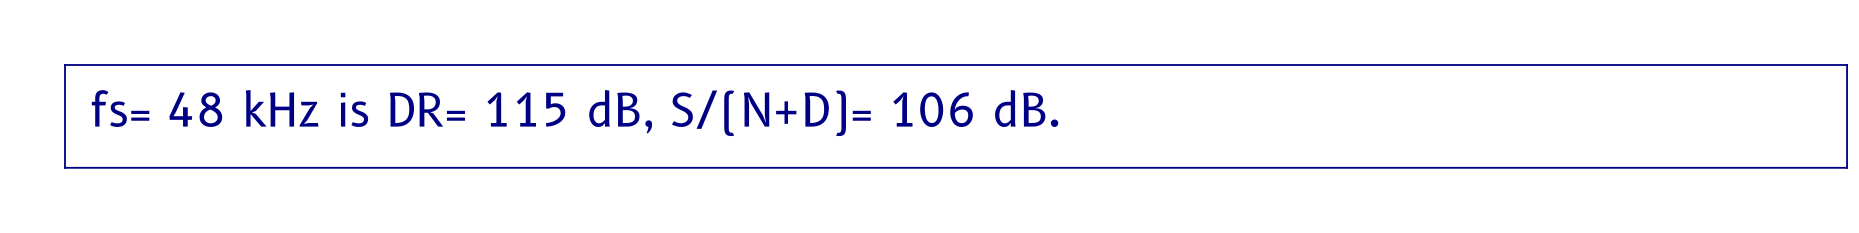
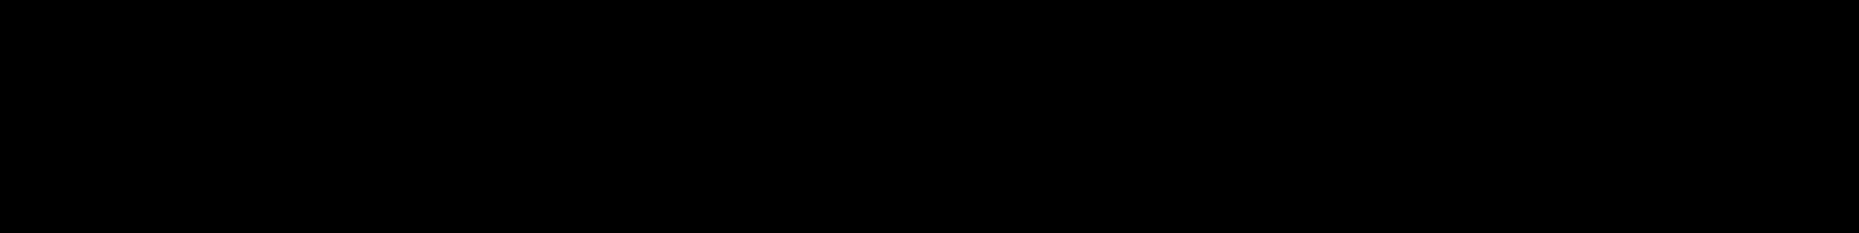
line: (64, 64) (1847, 64) (1847, 167) (64, 167) (64, 64) -> none
text: fs= 48 kHz is DR= 115 dB, S/(N+D)= 106 dB. (575, 113) -> none

